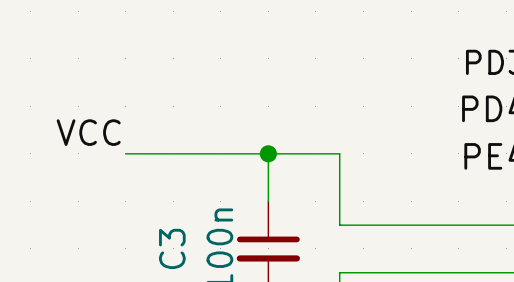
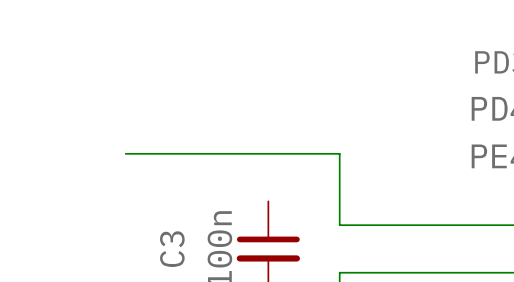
label: VCC (88, 132) -> none
wire: (268, 153) (268, 201) -> none
junction: (268, 153) -> none

